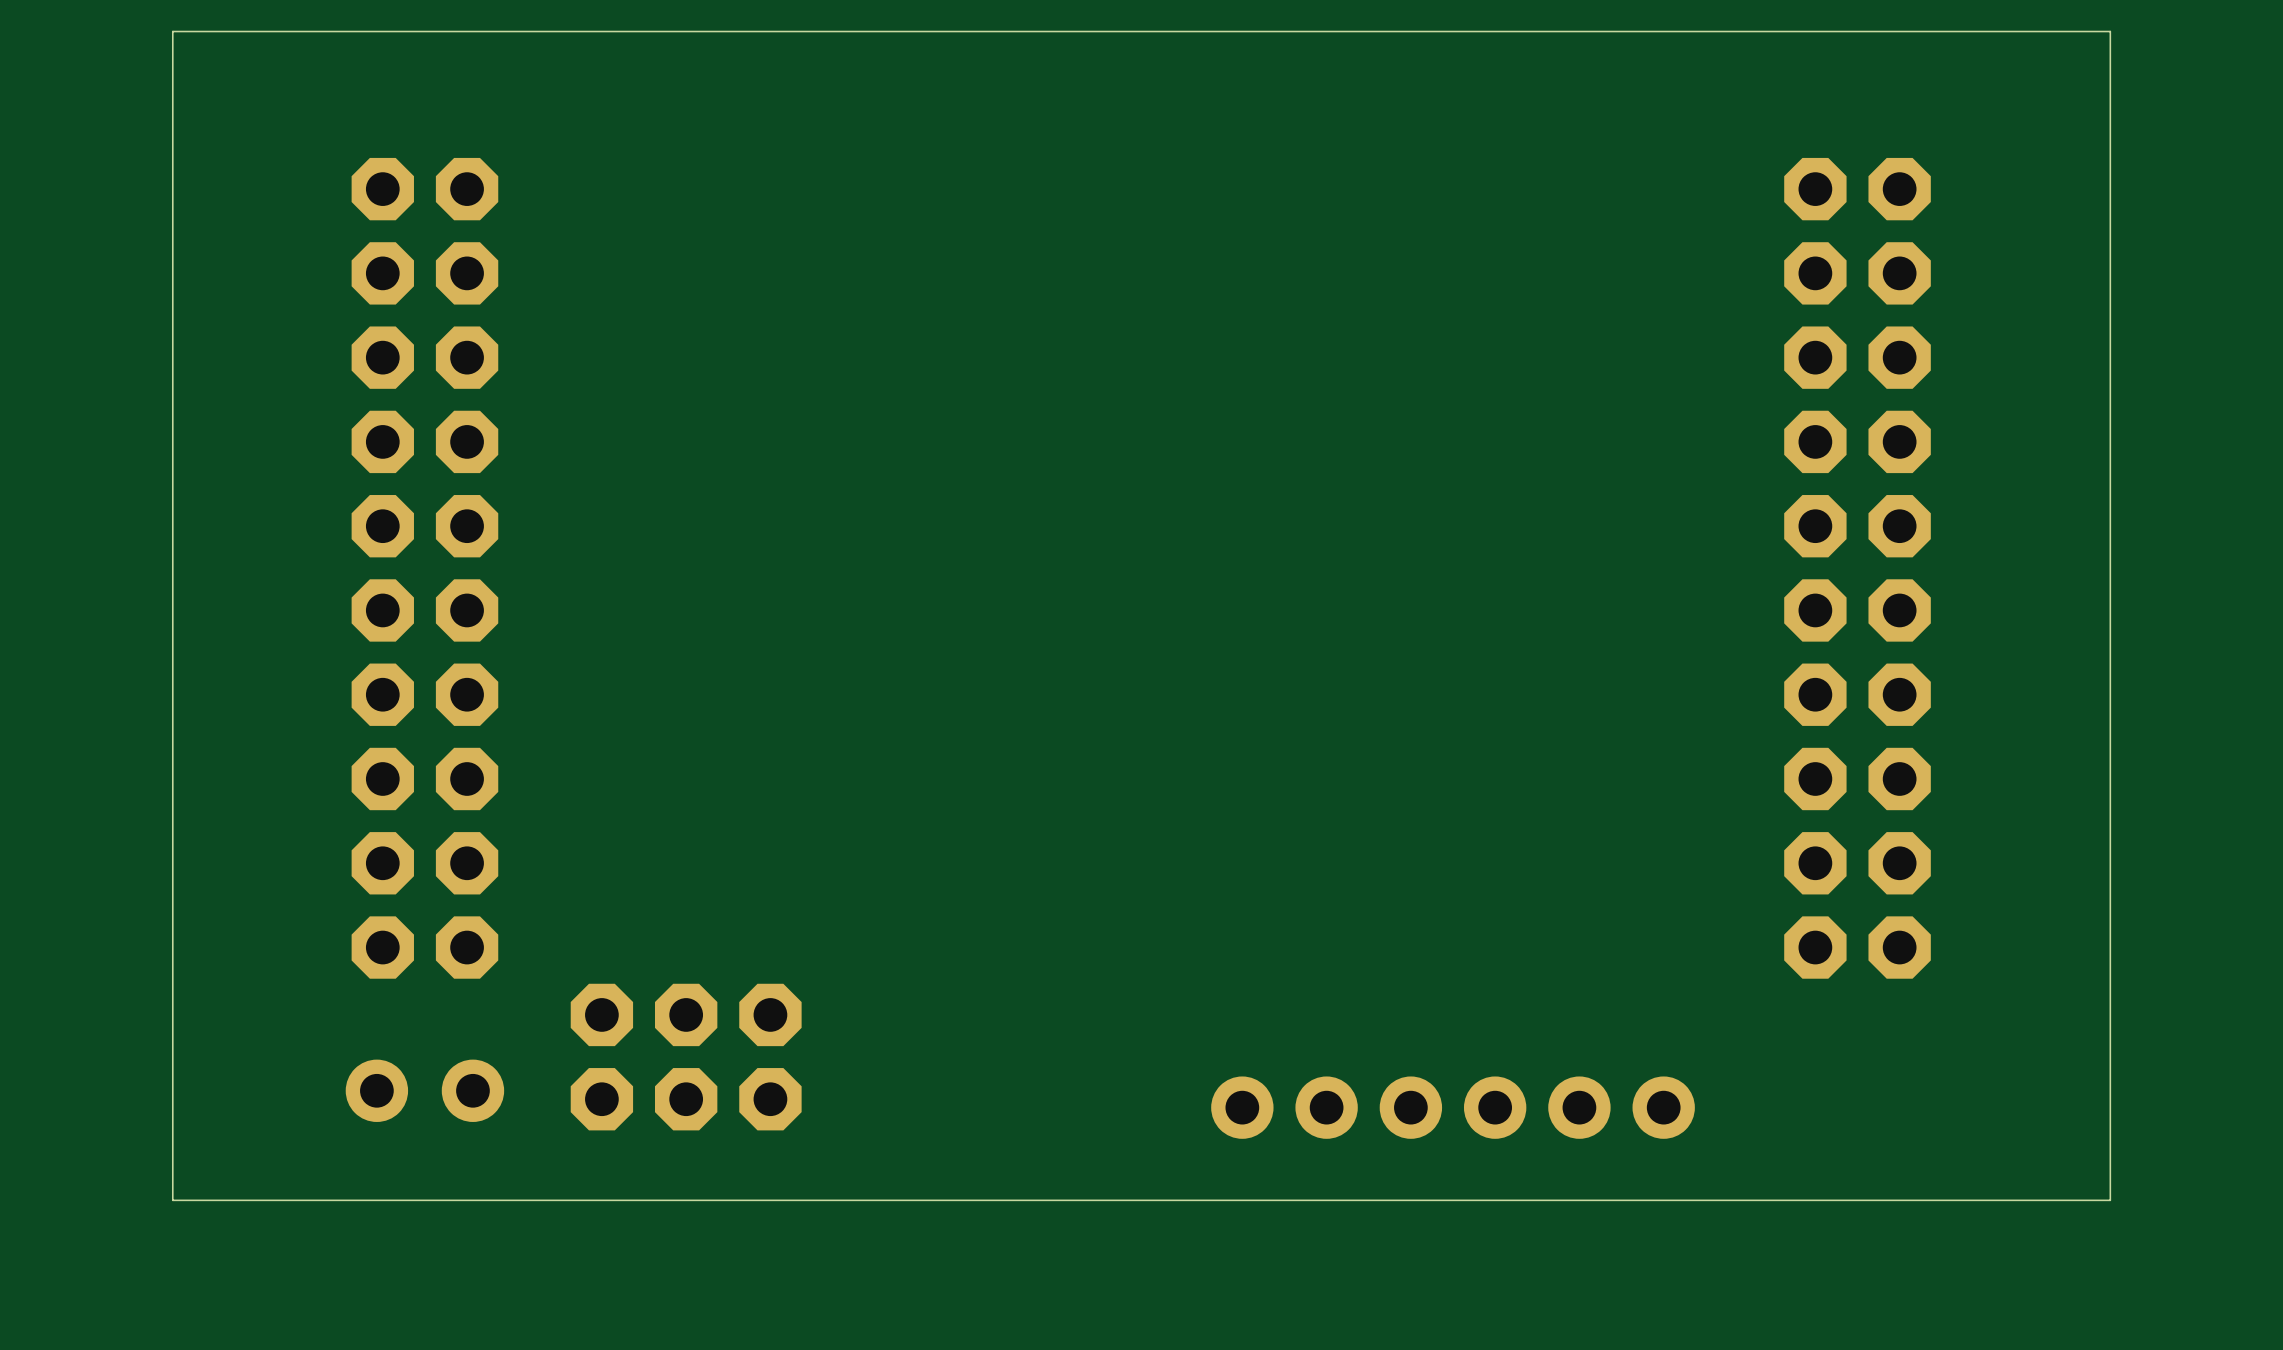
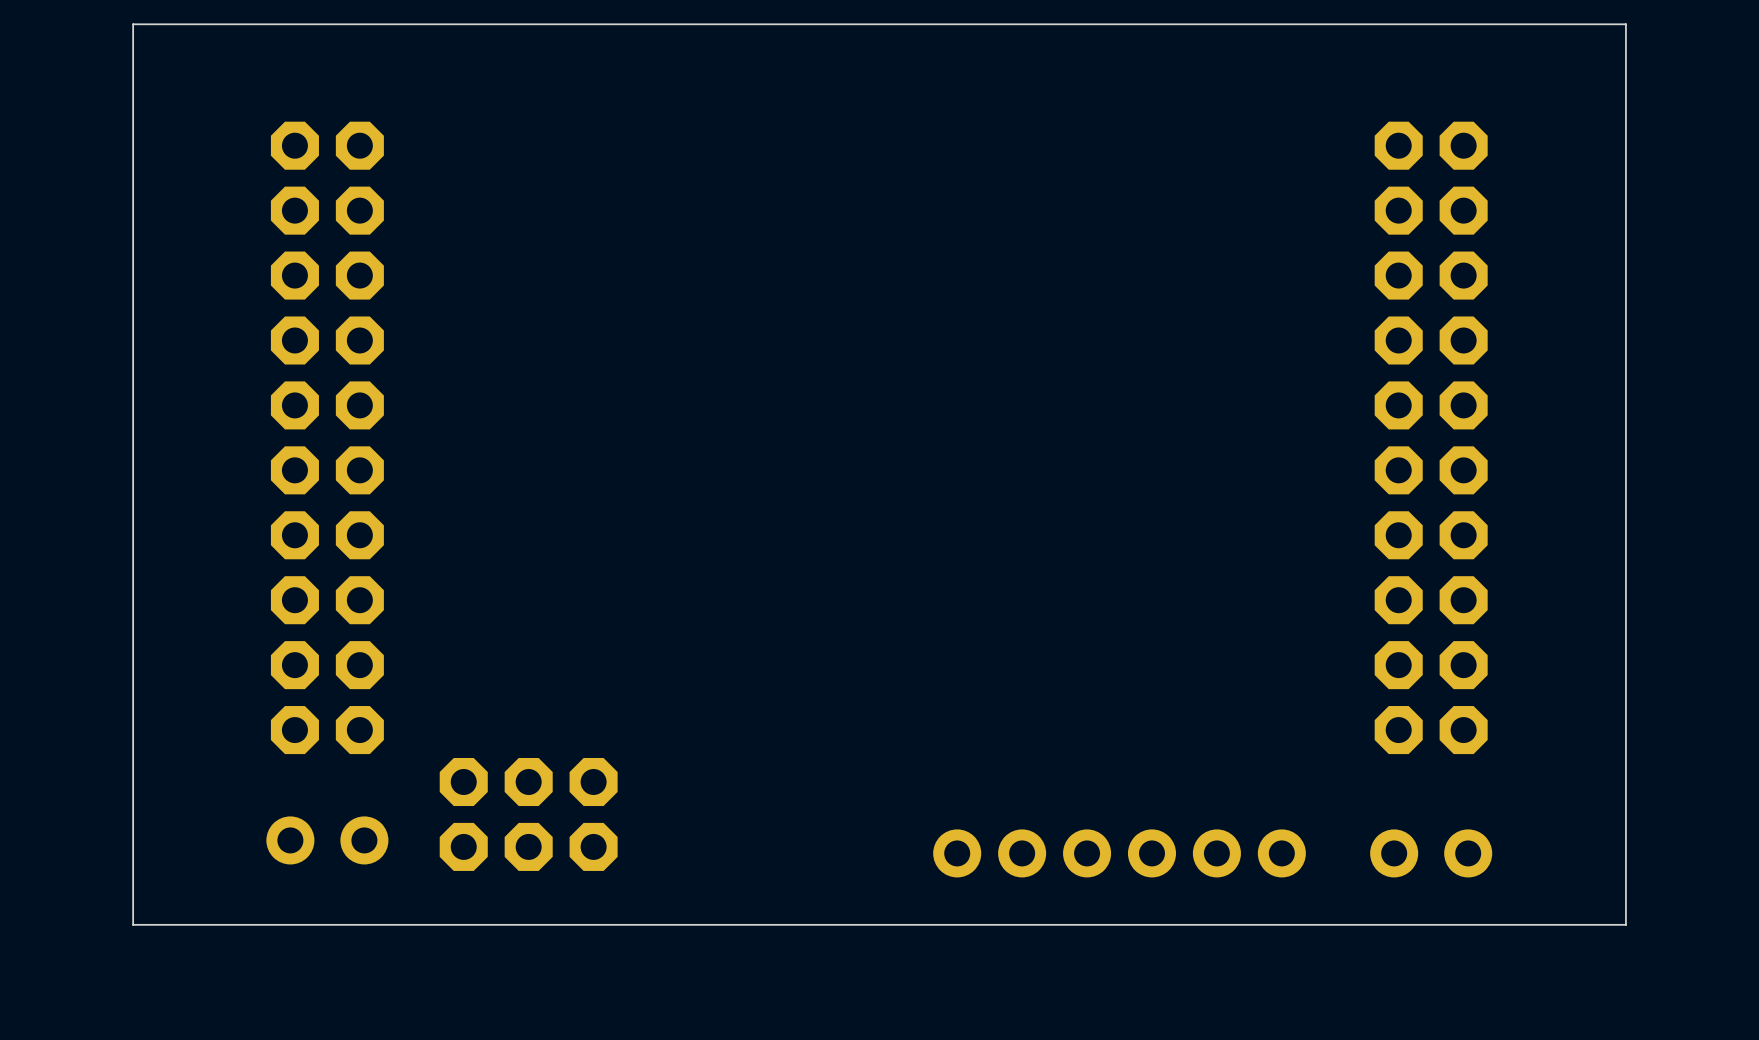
part: none -> (1431, 853)

